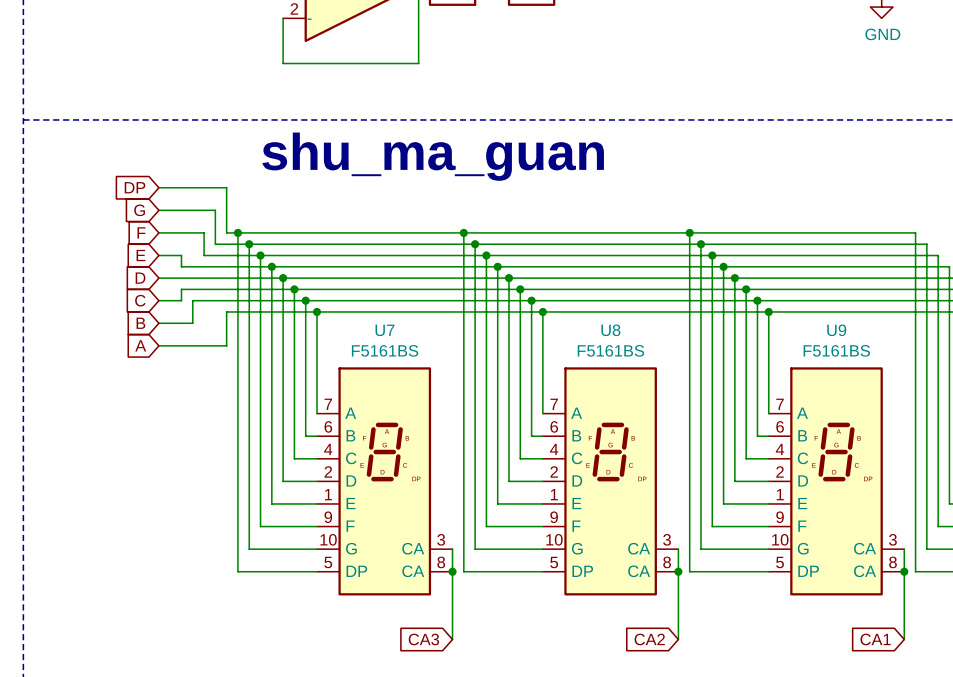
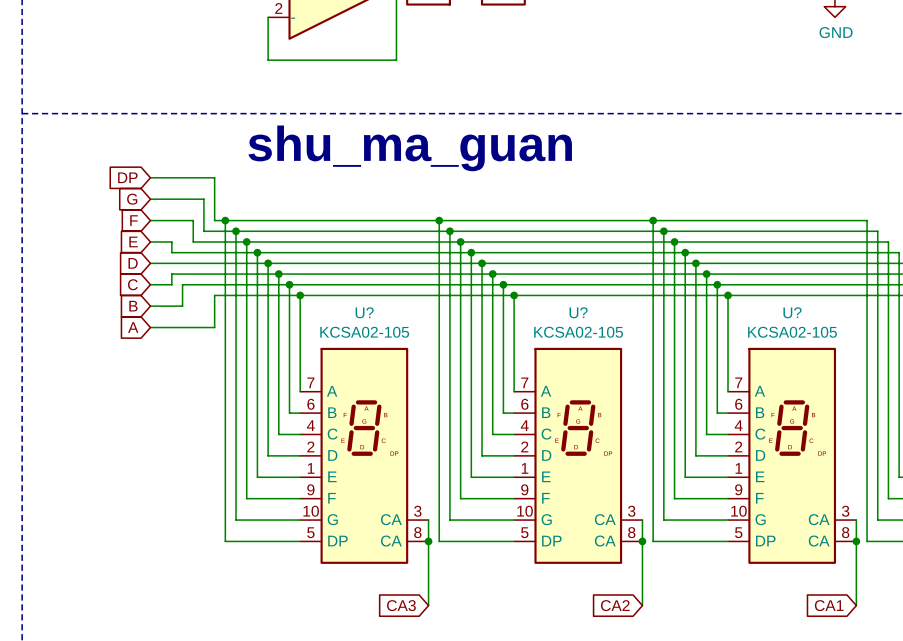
U7 name: U7 (384, 330) -> U? (364, 312)
U8 name: U8 (610, 330) -> U? (578, 312)
U9 name: U9 (836, 330) -> U? (792, 312)
U7 value: F5161BS (385, 350) -> KCSA02-105 (364, 332)
U8 value: F5161BS (610, 350) -> KCSA02-105 (578, 332)
U9 value: F5161BS (836, 350) -> KCSA02-105 (792, 332)

